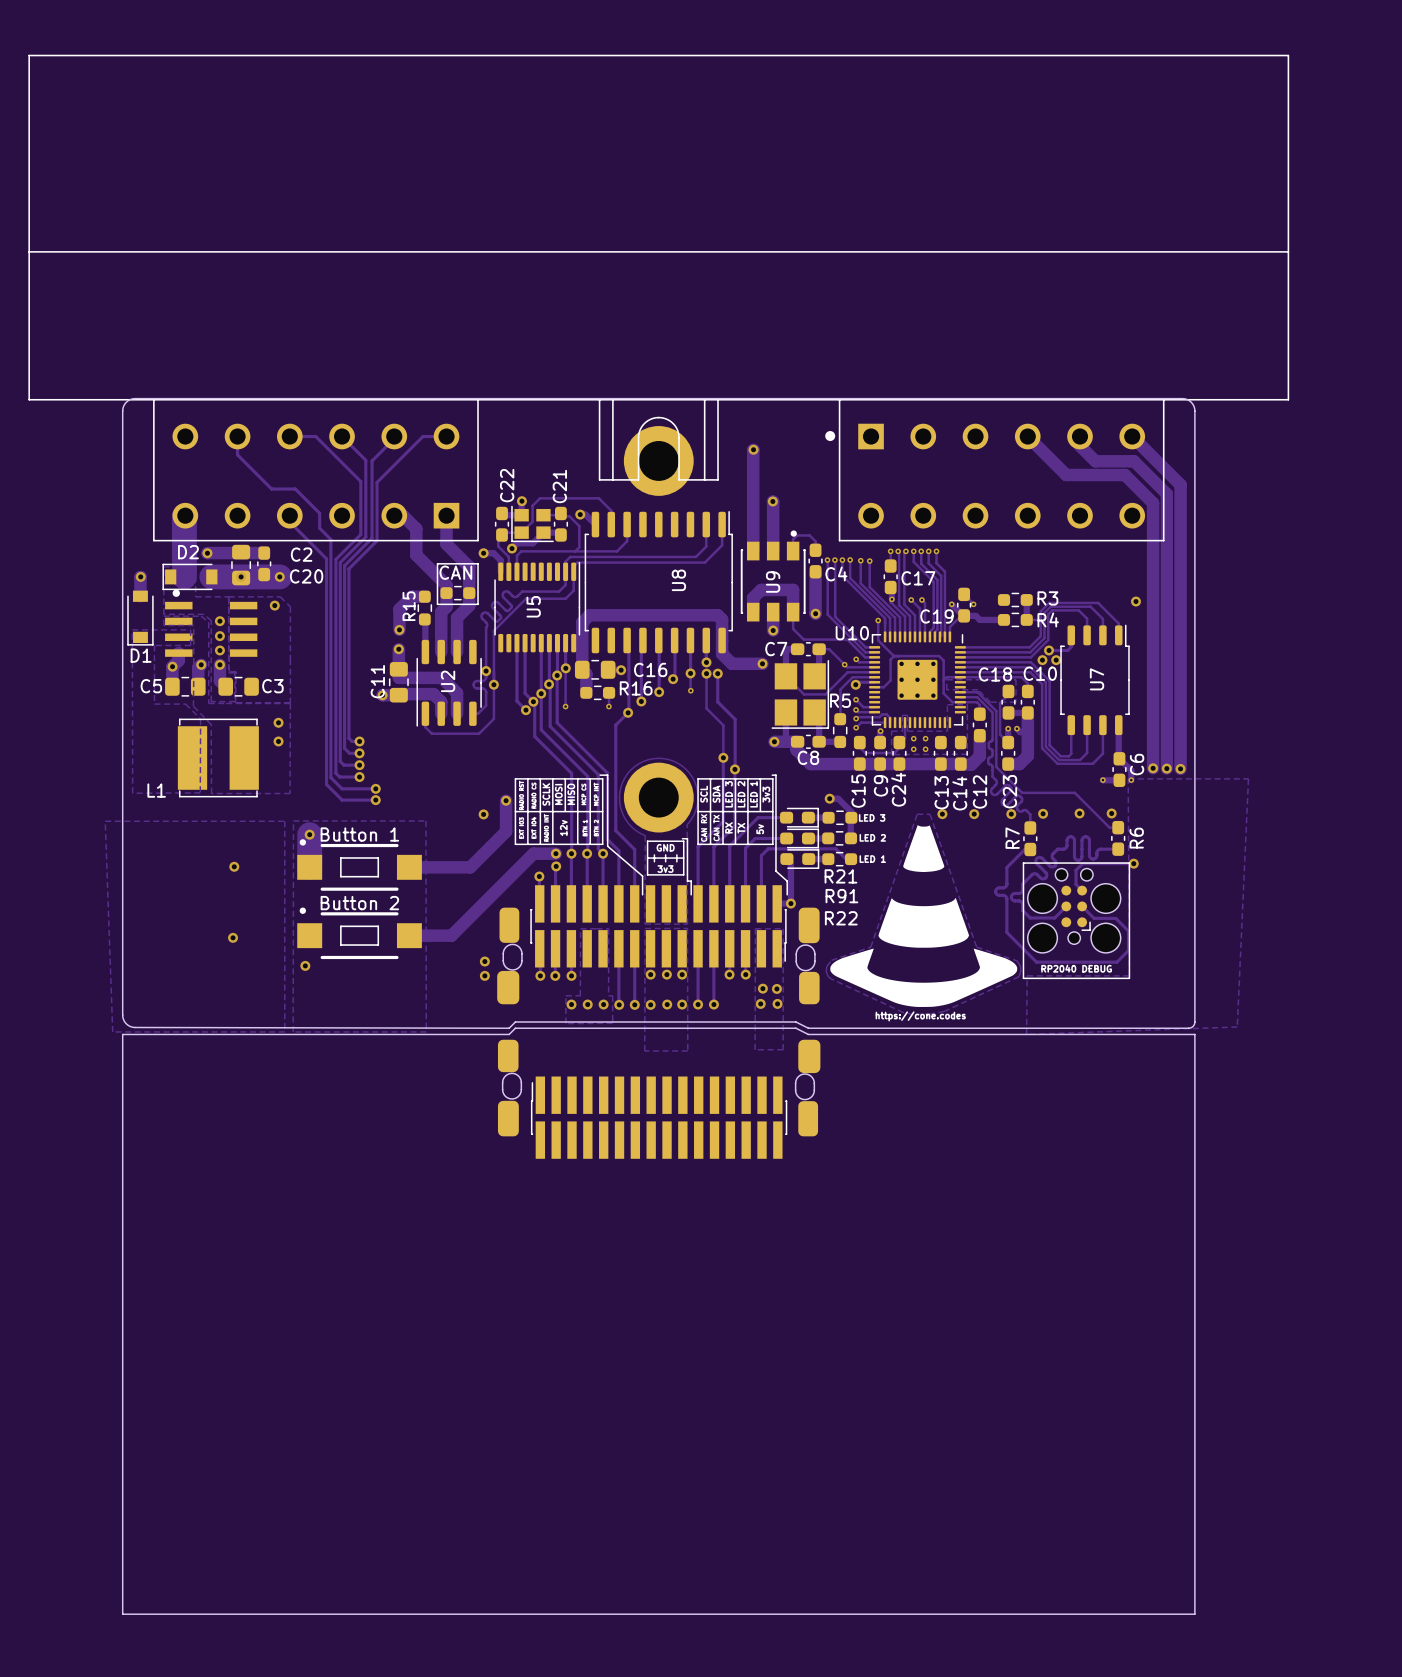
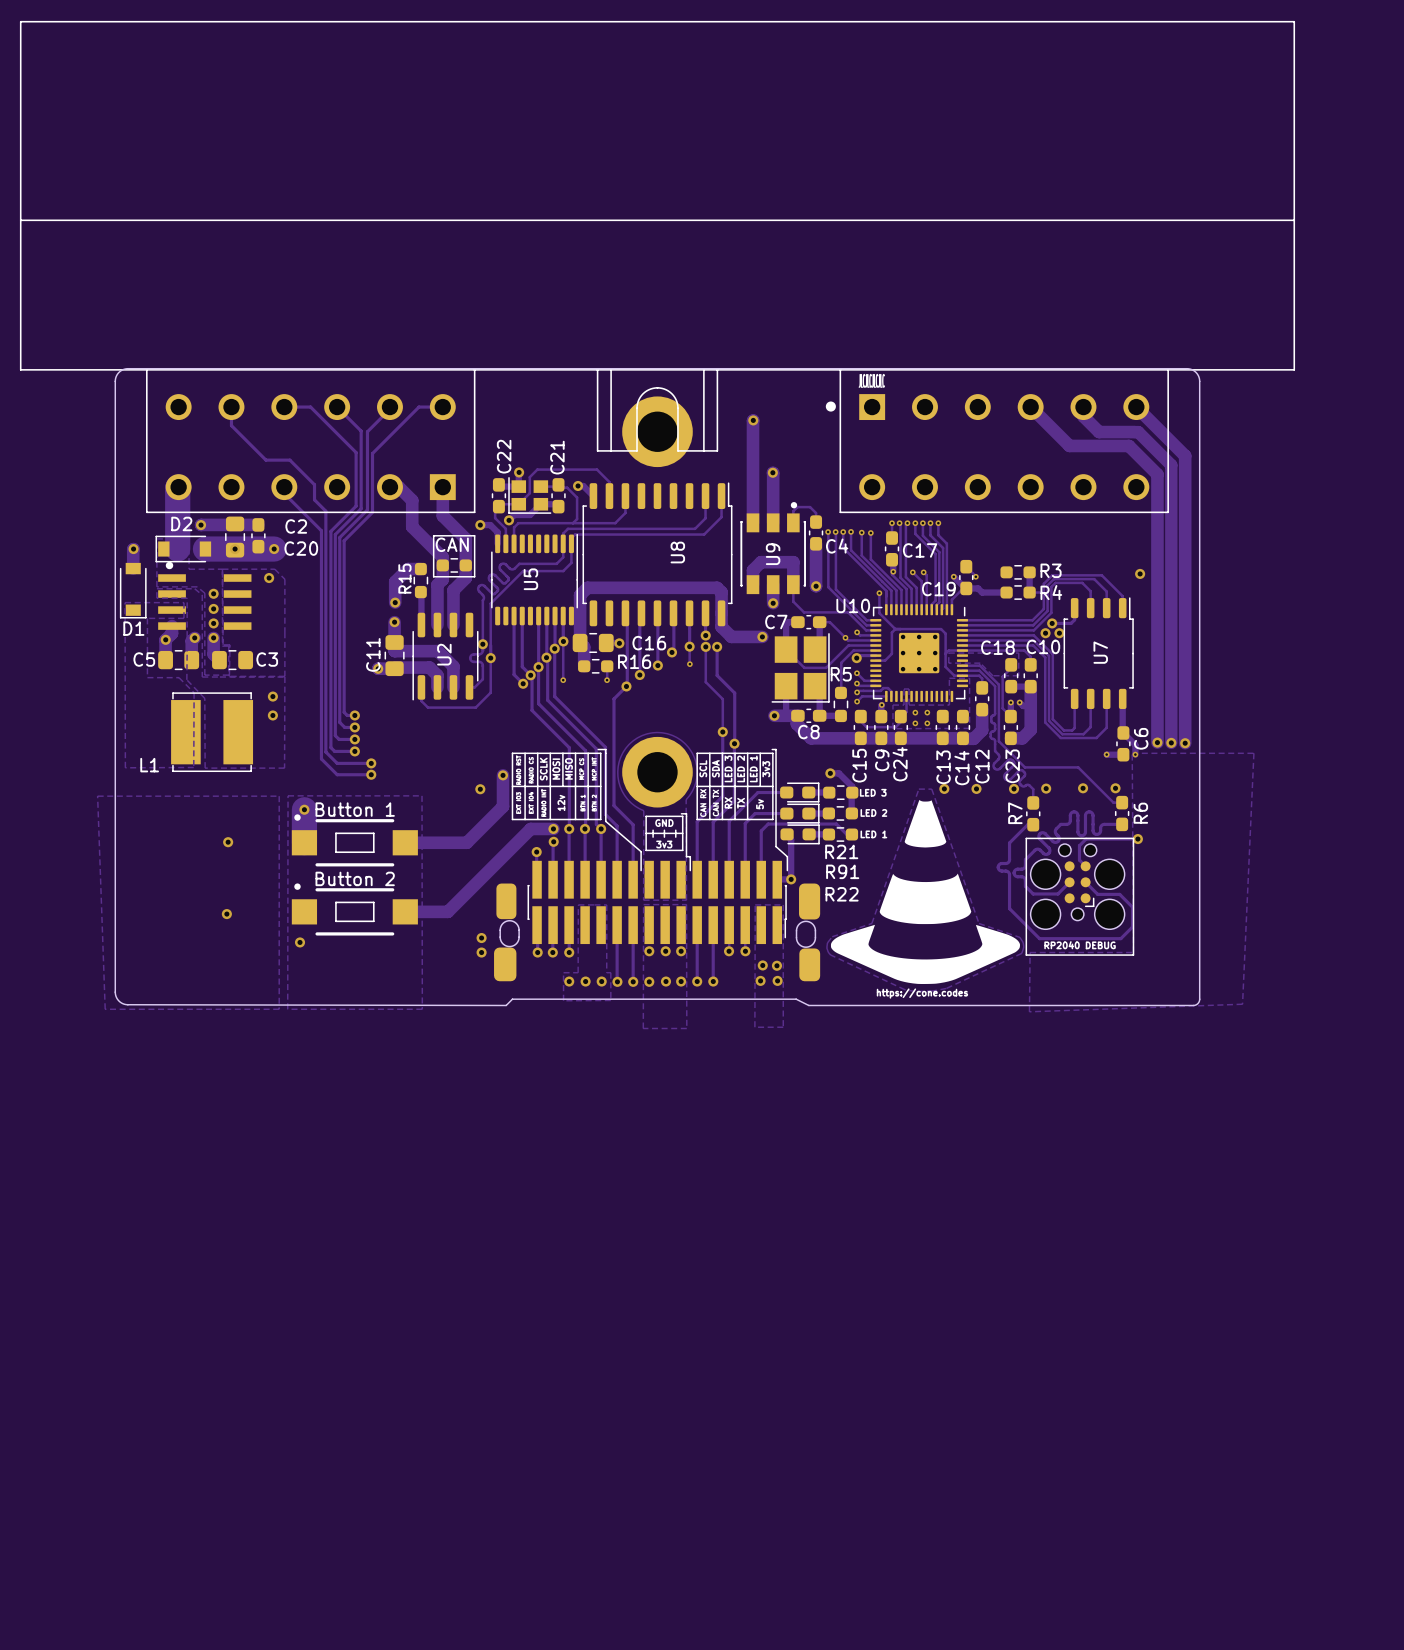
text: none -> JLCJLCJLCJLC (871, 380)
board edge: (515, 1028) (795, 1028) (808, 1034) (1194, 1034) (1194, 1614) (122, 1614) (122, 1034) (509, 1034) (515, 1028) -> none
part: (659, 1099) -> none

